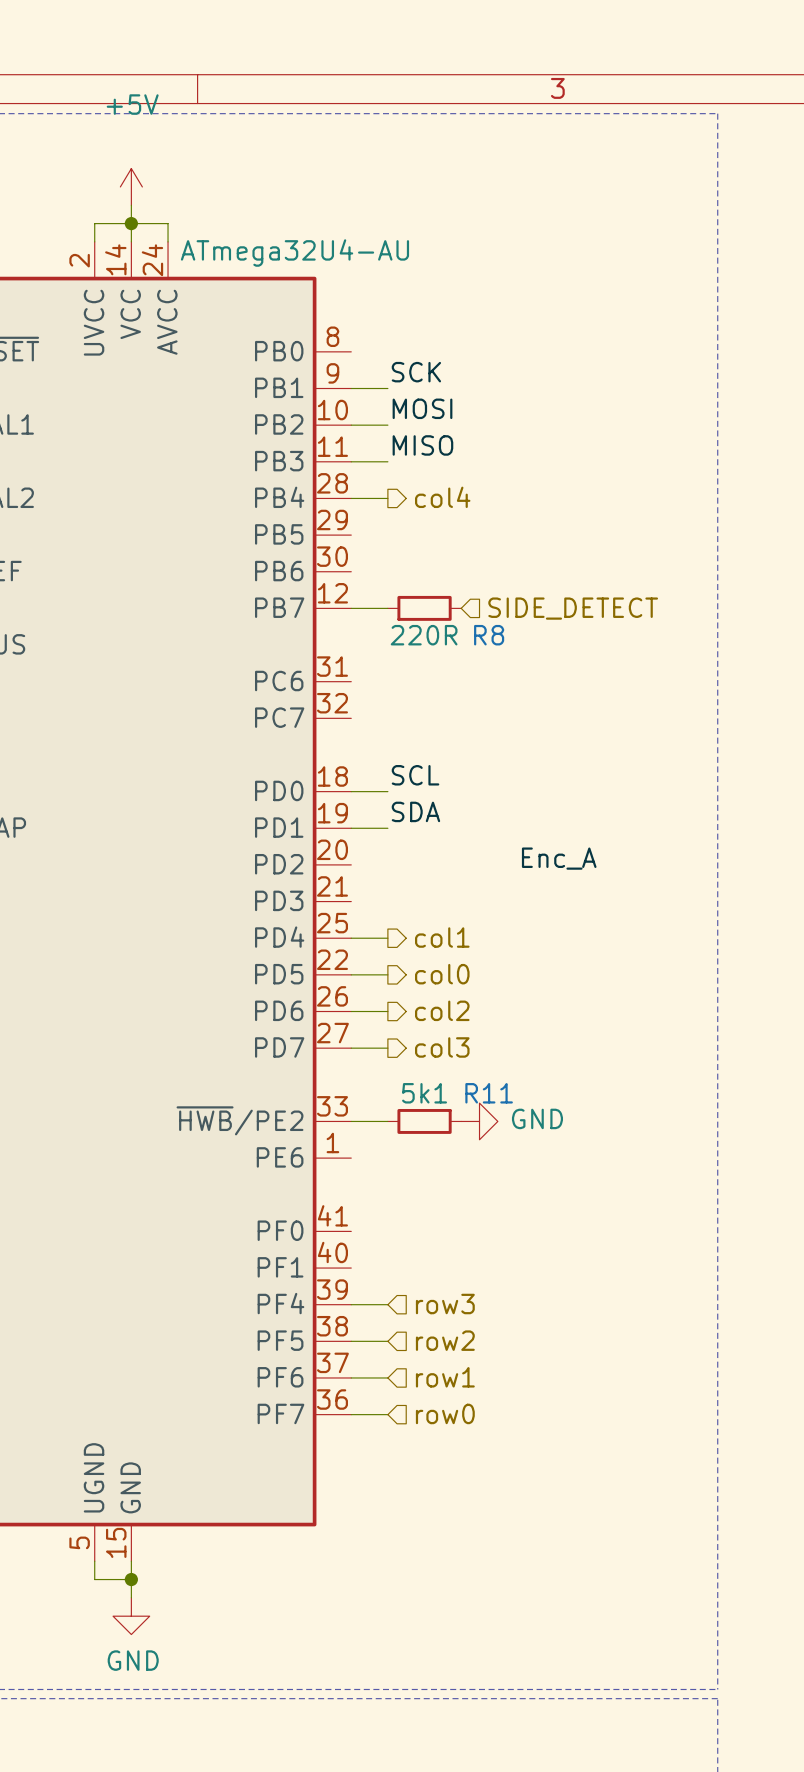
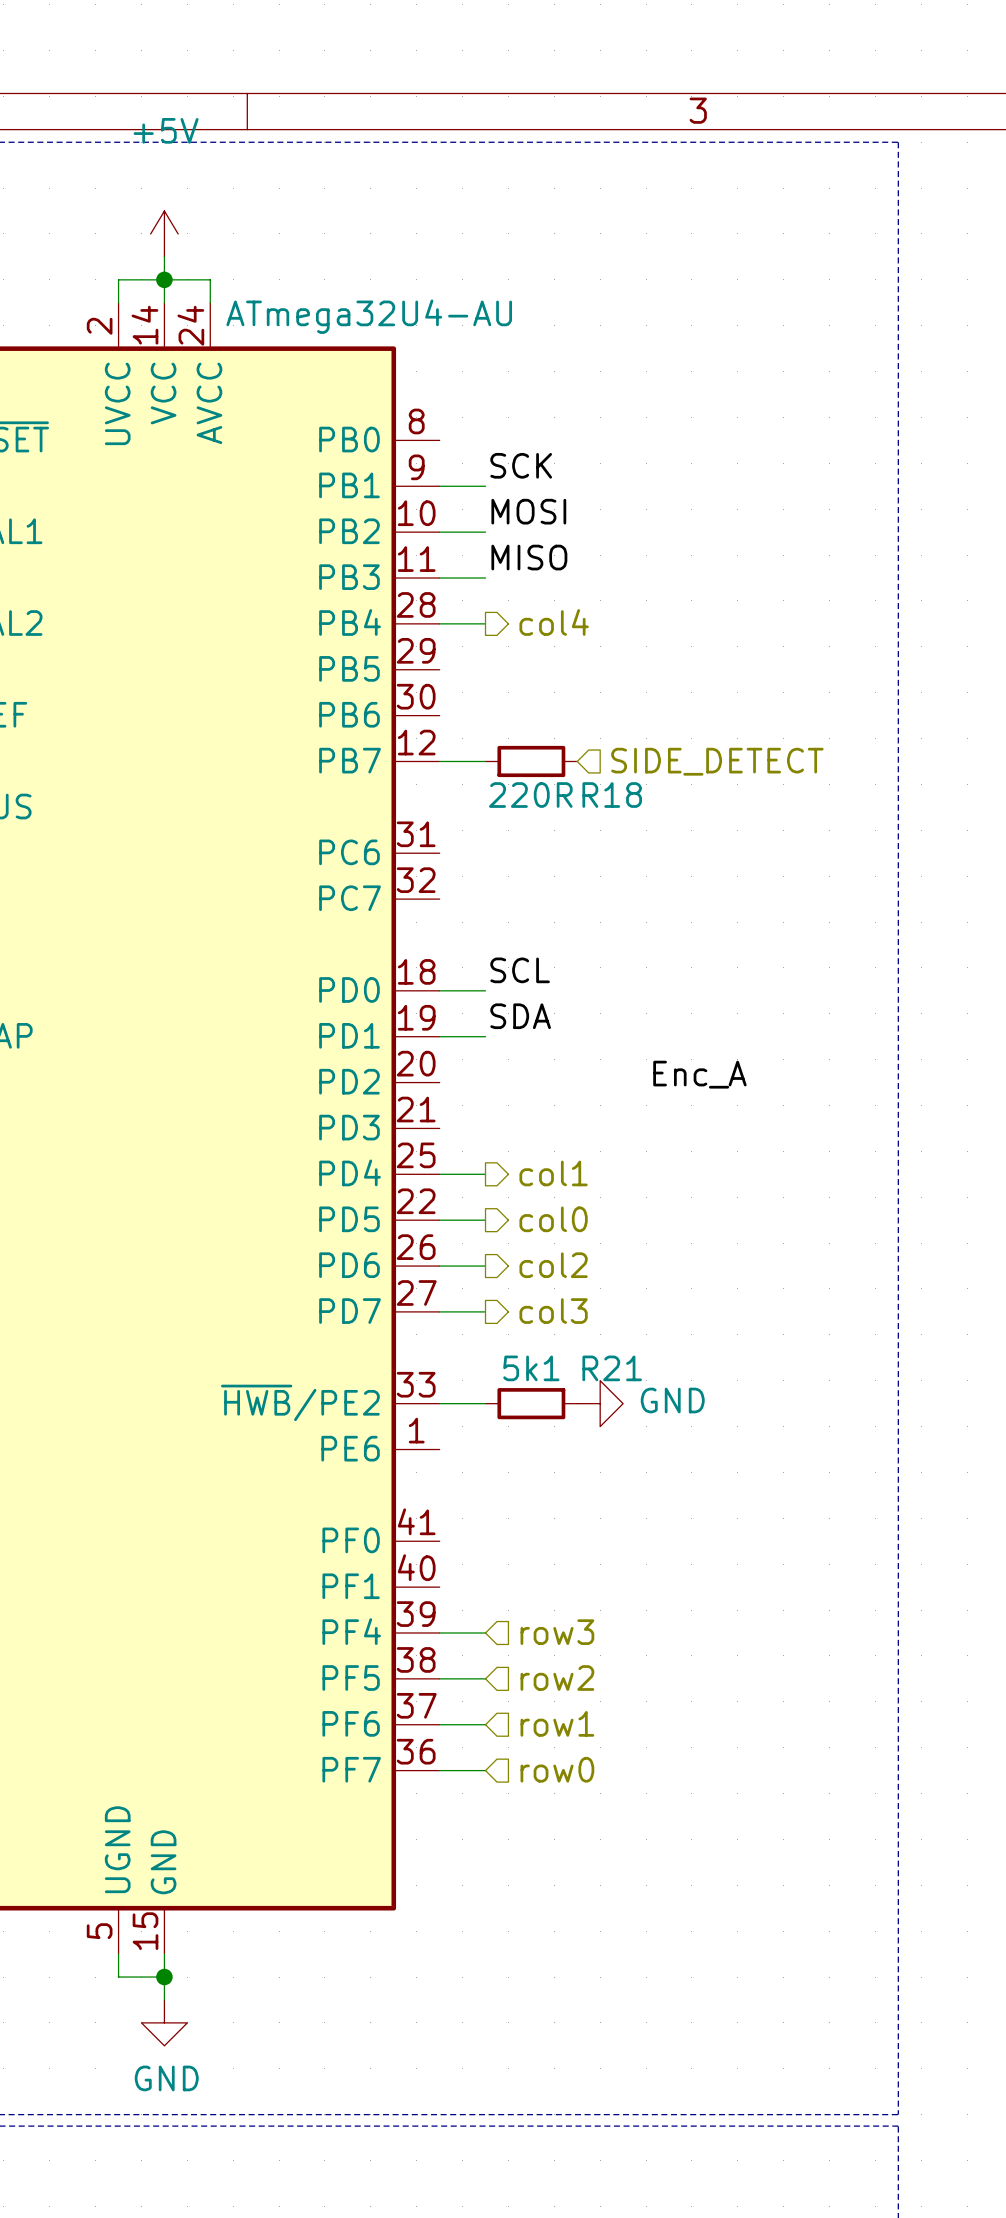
R8 name: R8 (489, 635) -> R18 (612, 795)
R11 name: R11 (489, 1093) -> R21 (612, 1368)

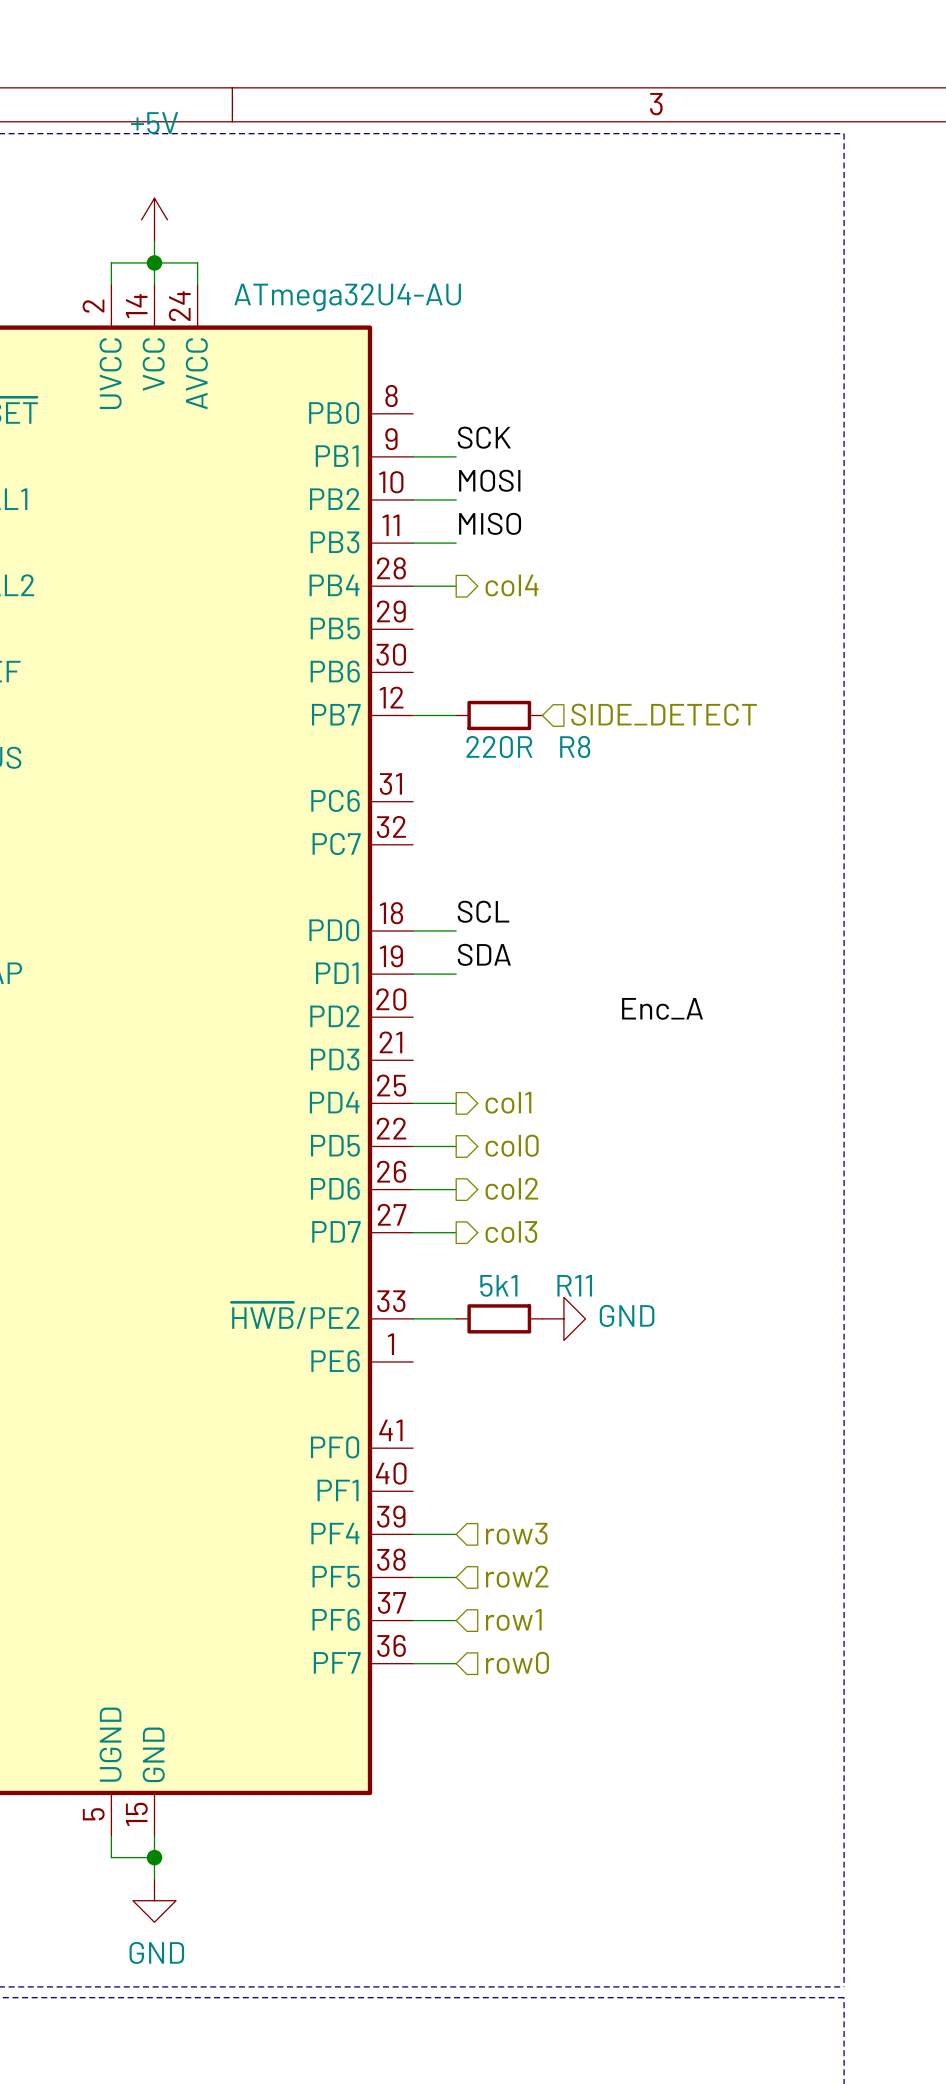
R18 name: R18 (612, 795) -> R8 (575, 746)
R21 name: R21 (612, 1368) -> R11 (574, 1285)

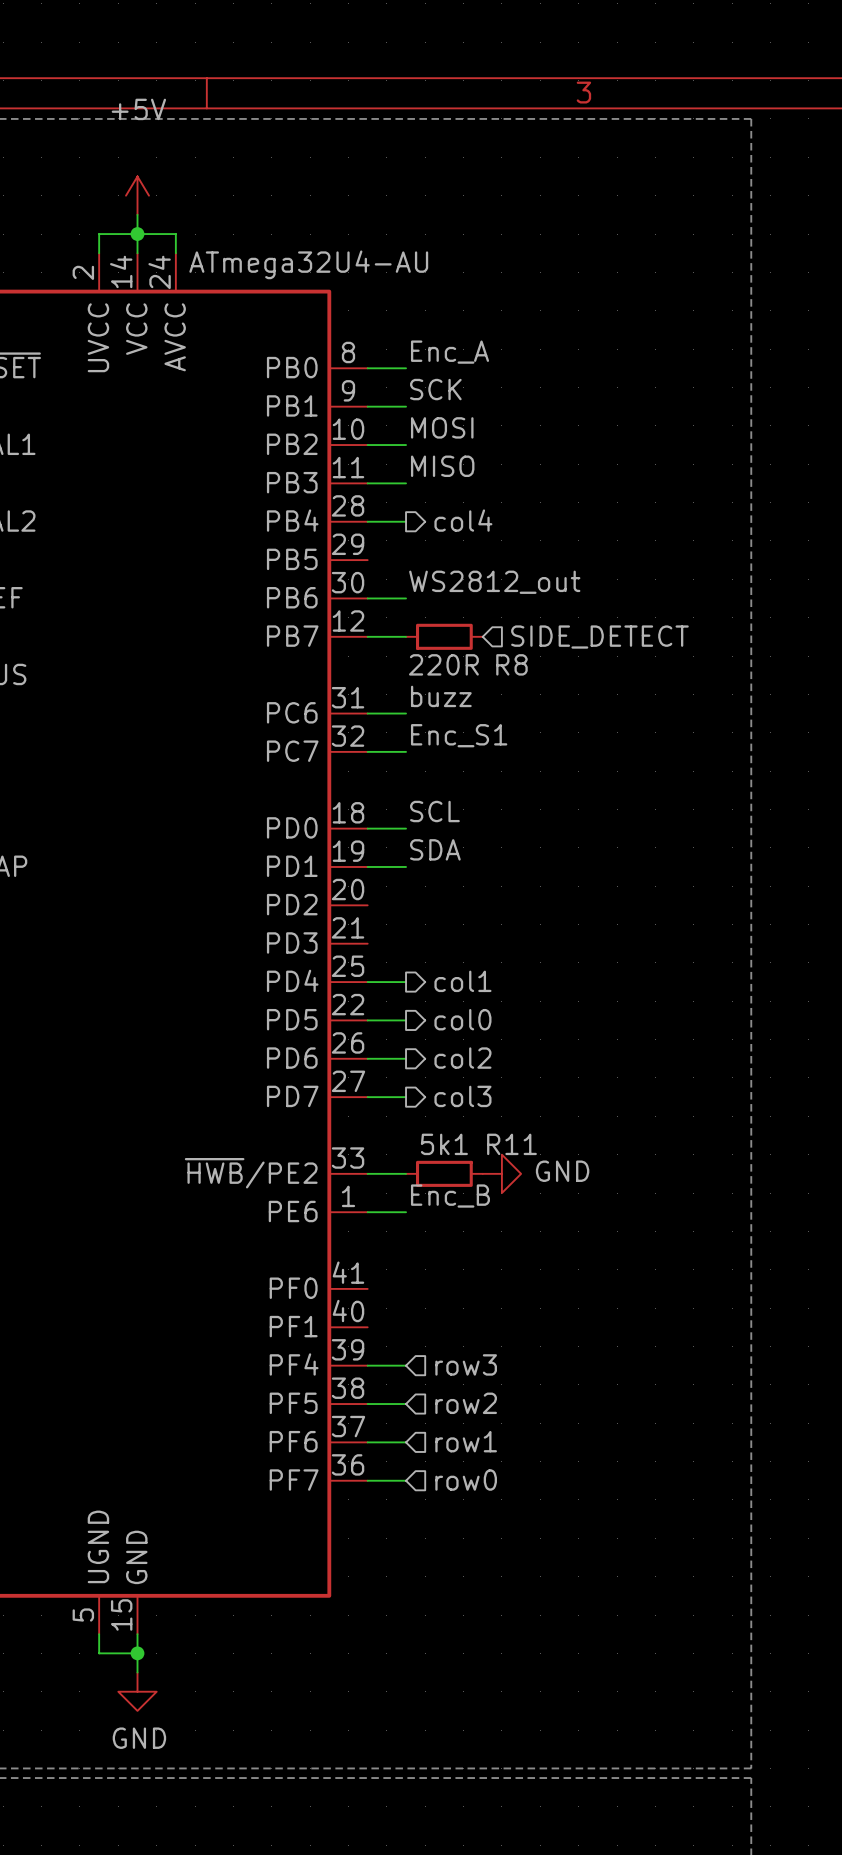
label: none -> Enc_A (450, 352)
wire: none -> (367, 368) (406, 368)
label: none -> WS2812_out (494, 582)
wire: none -> (367, 598) (406, 598)
label: none -> buzz (441, 696)
wire: none -> (367, 713) (406, 713)
label: none -> Enc_S1 (459, 735)
wire: none -> (367, 751) (406, 751)
label: Enc_A (662, 1008) -> none
label: none -> Enc_B (450, 1196)
wire: none -> (367, 1212) (406, 1212)

